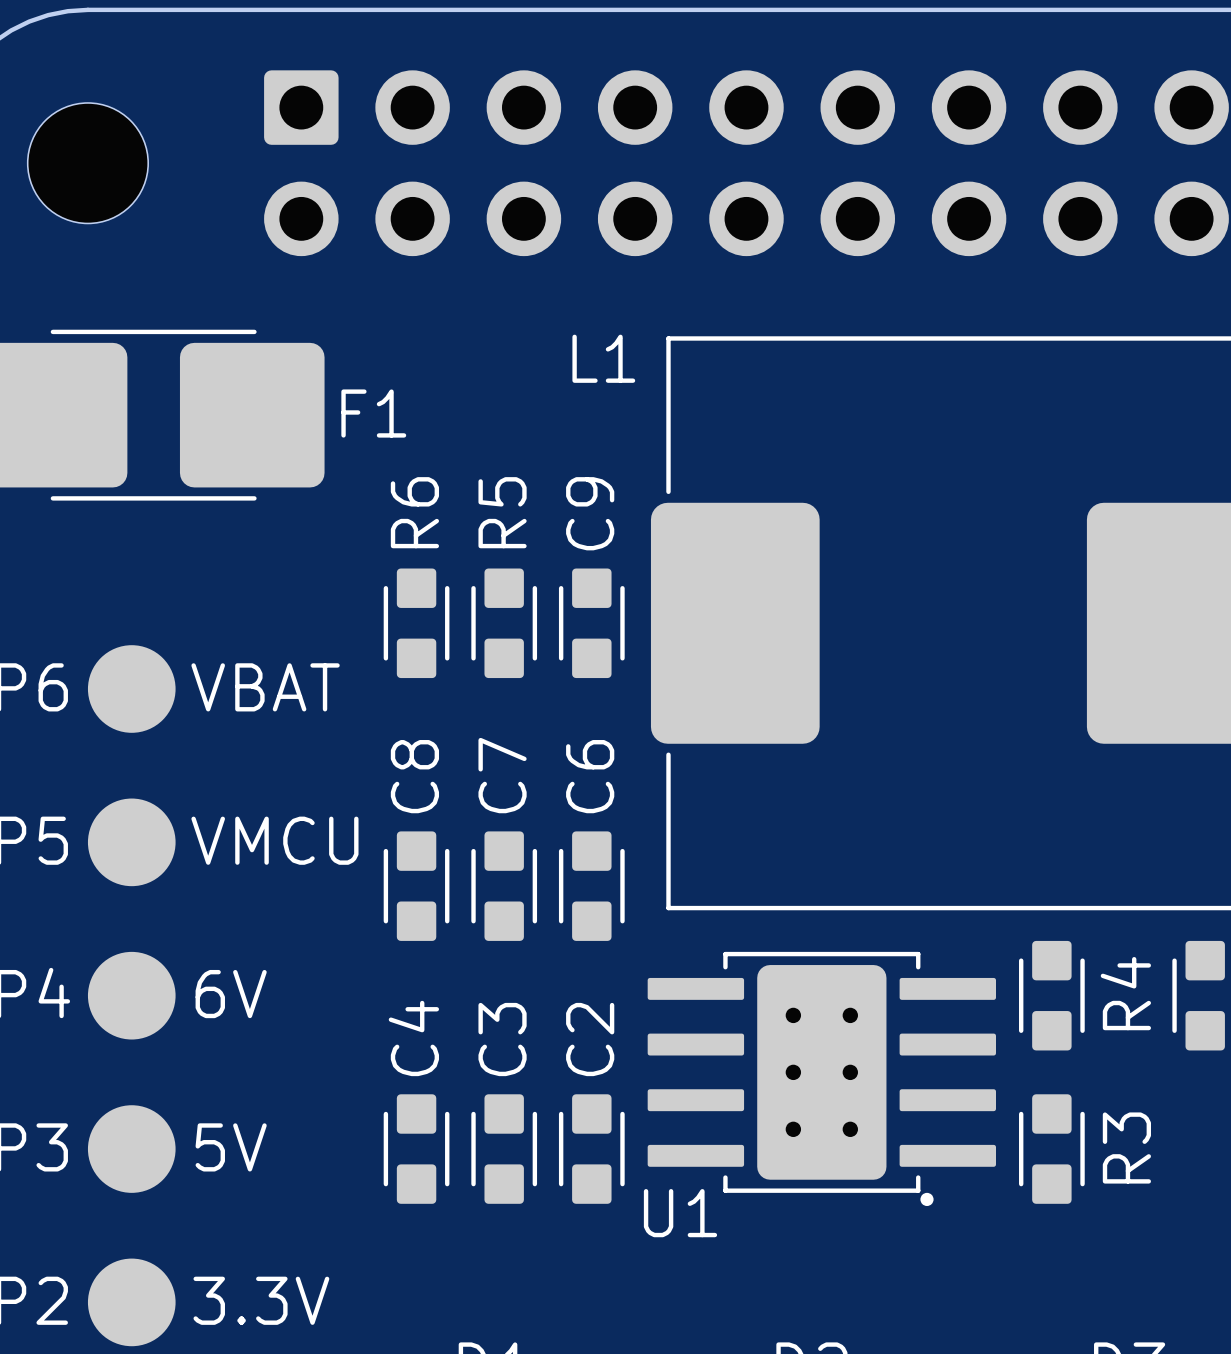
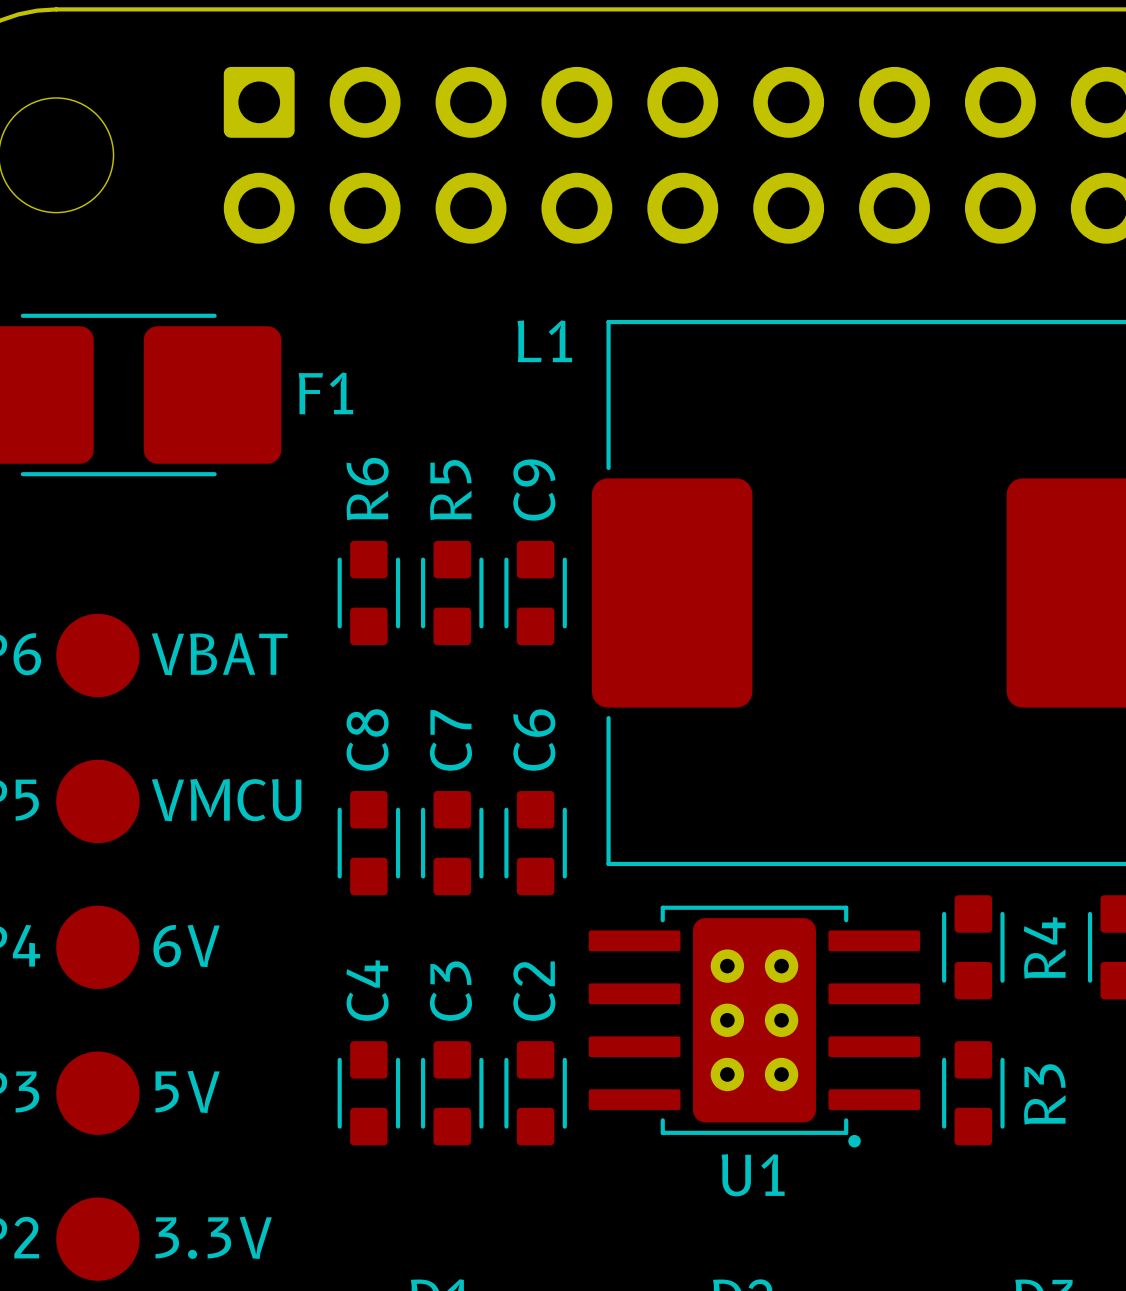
U1 name position: U1 (680, 1213) -> U1 (753, 1175)

